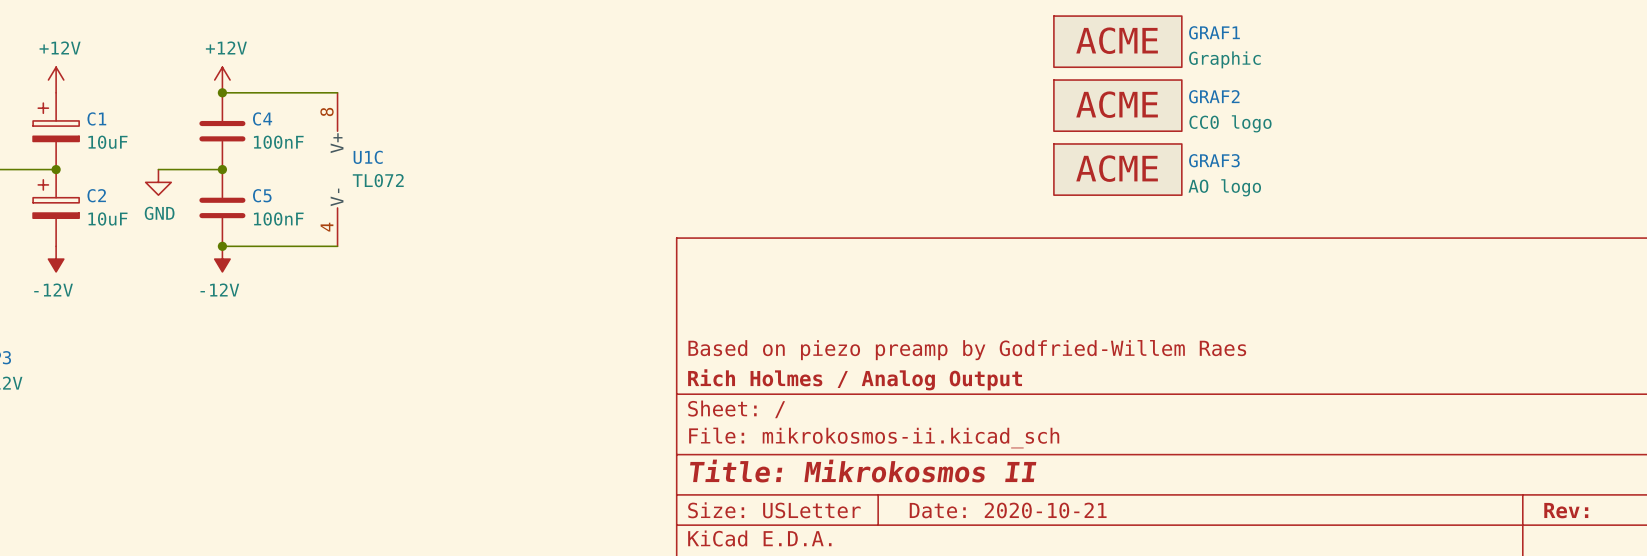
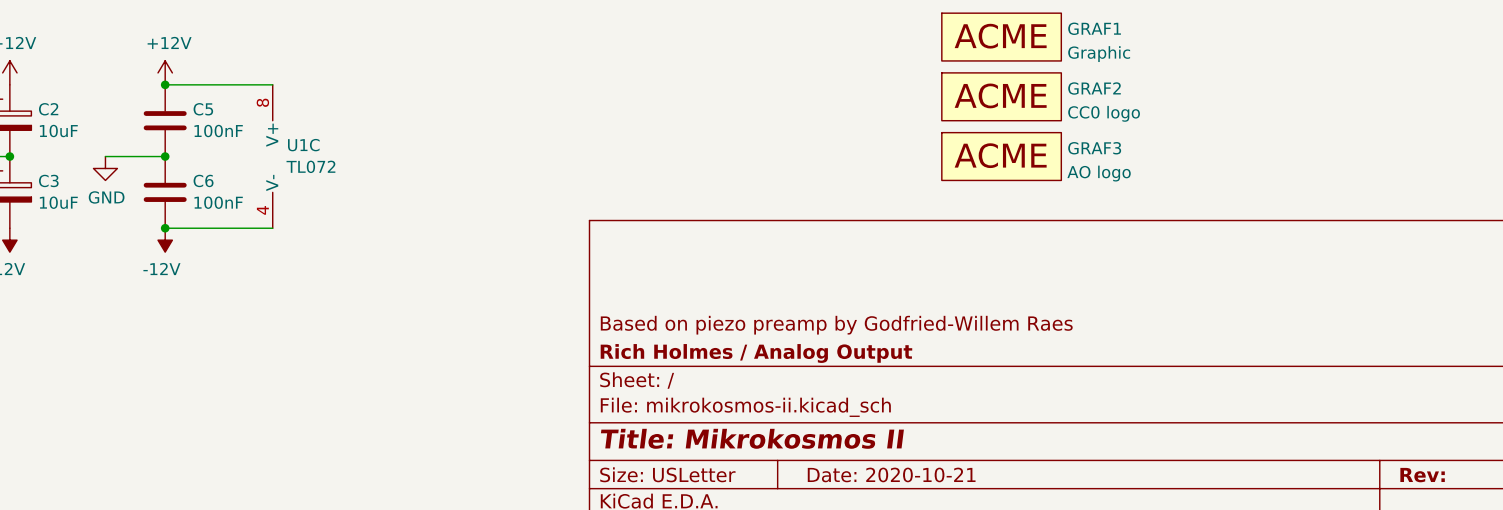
C1 name: C1 (96, 118) -> C2 (48, 109)
C4 name: C4 (262, 118) -> C5 (203, 109)
C2 name: C2 (96, 195) -> C3 (48, 180)
C5 name: C5 (262, 195) -> C6 (203, 180)

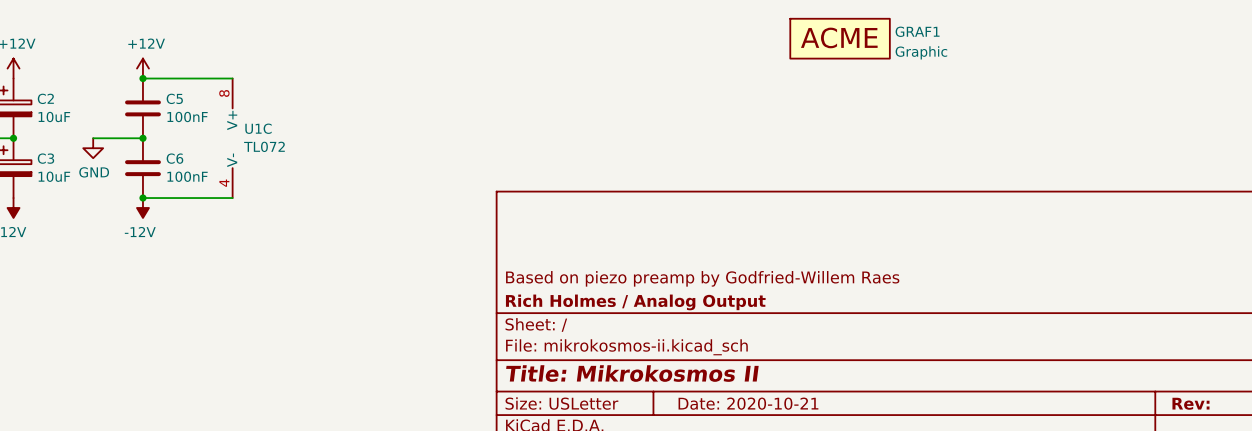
GRAF2: CC0 logo (1001, 96) -> none
GRAF3: AO logo (1001, 156) -> none

